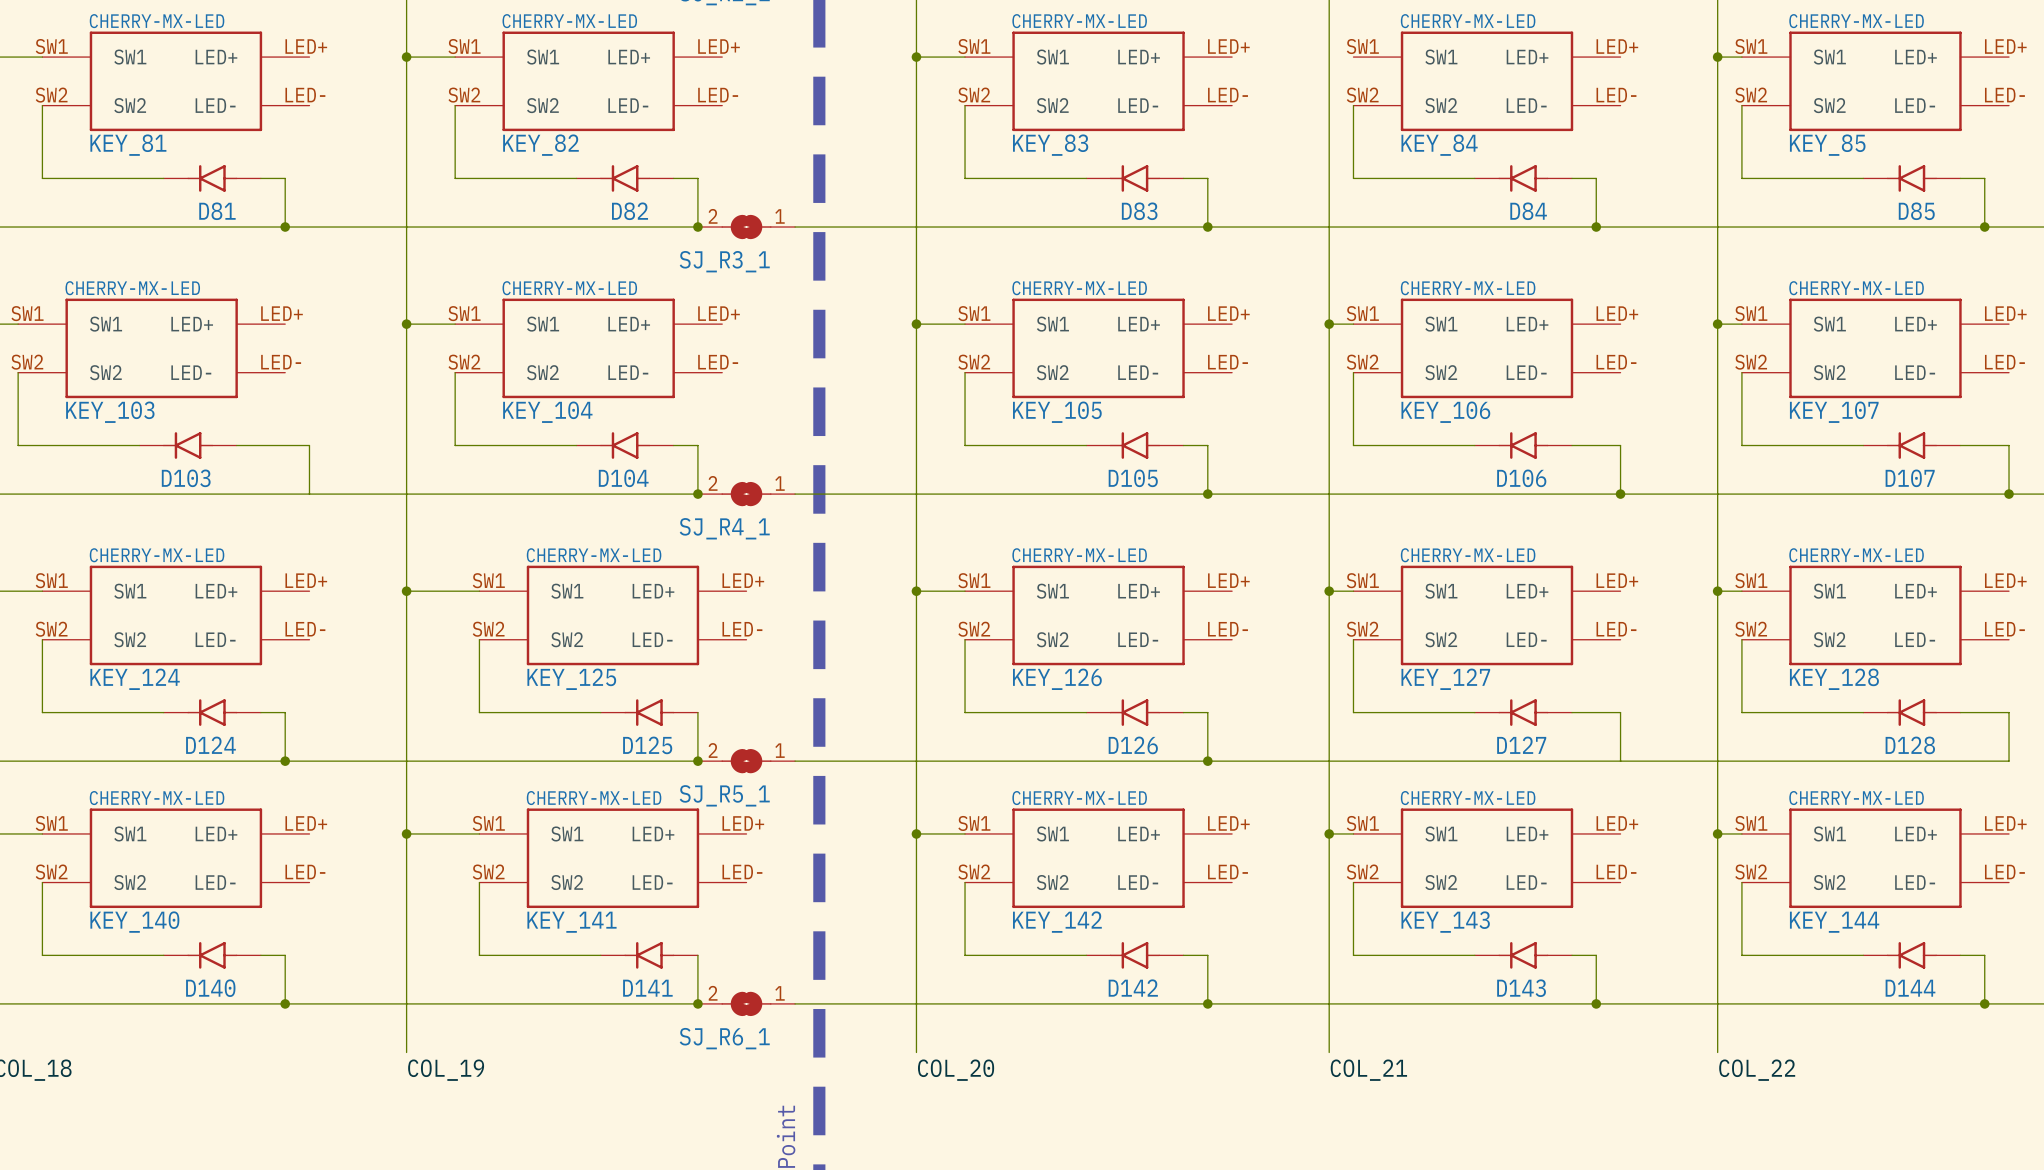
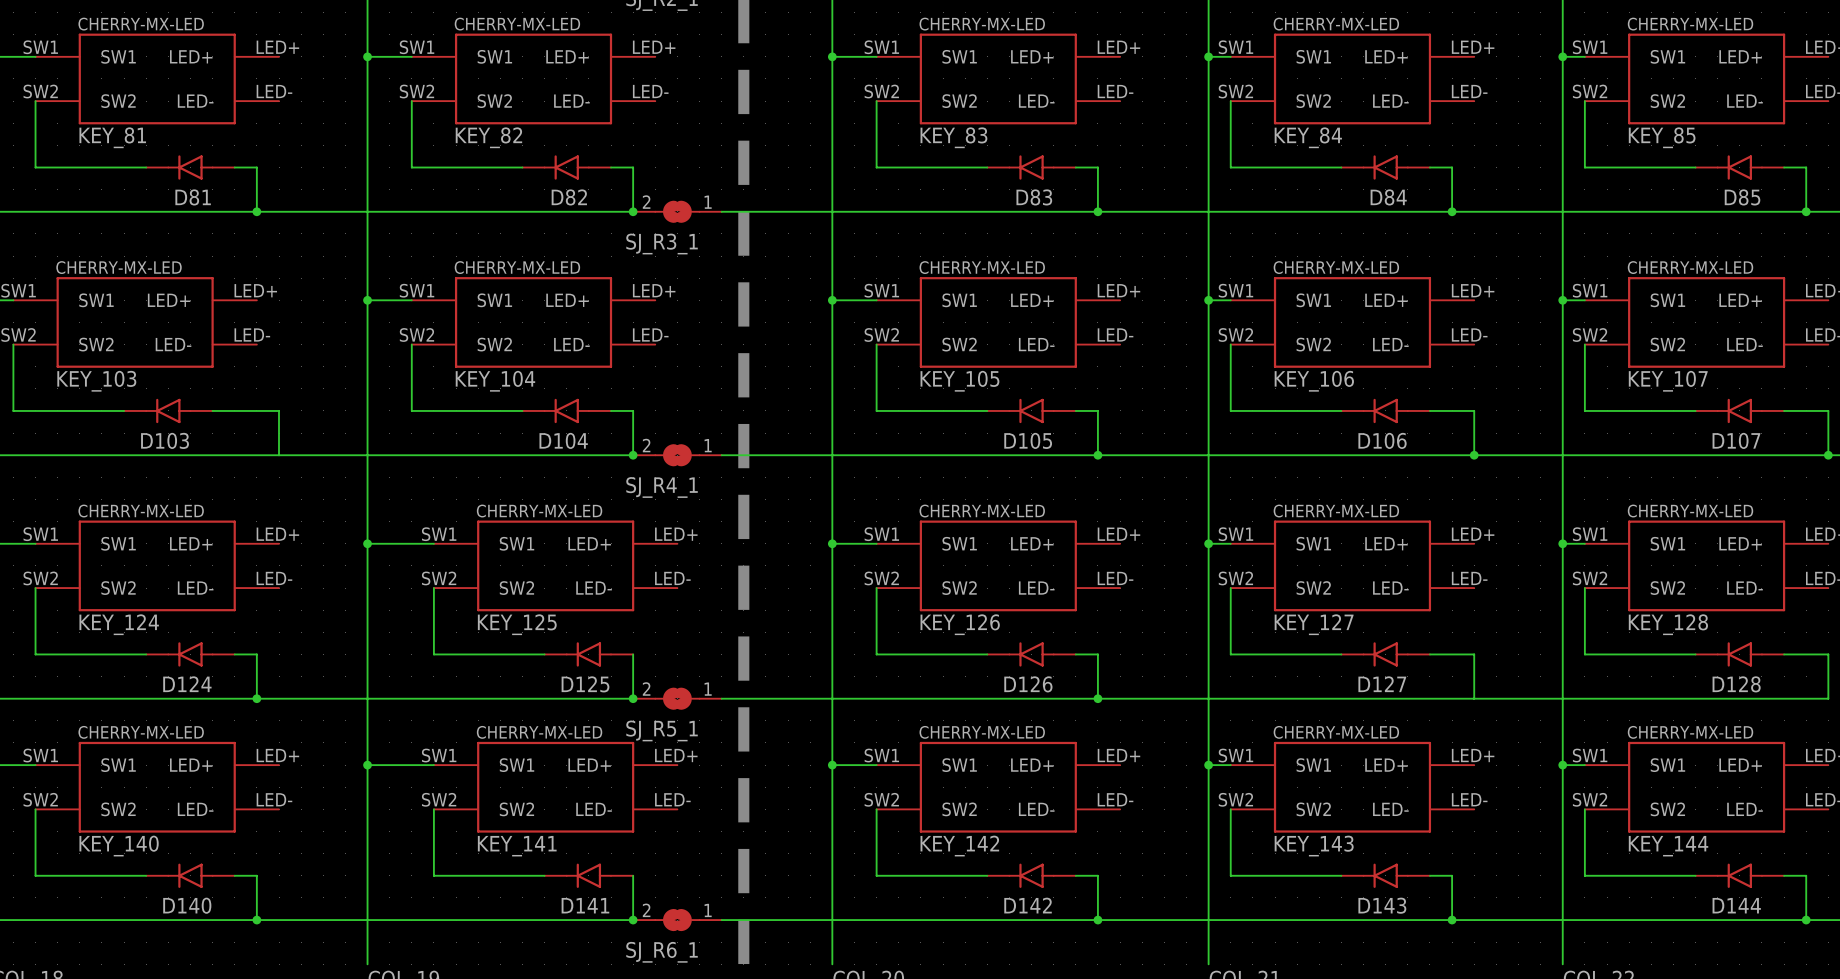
wire: none -> (1208, 56) (1230, 56)
junction: none -> (1208, 56)

